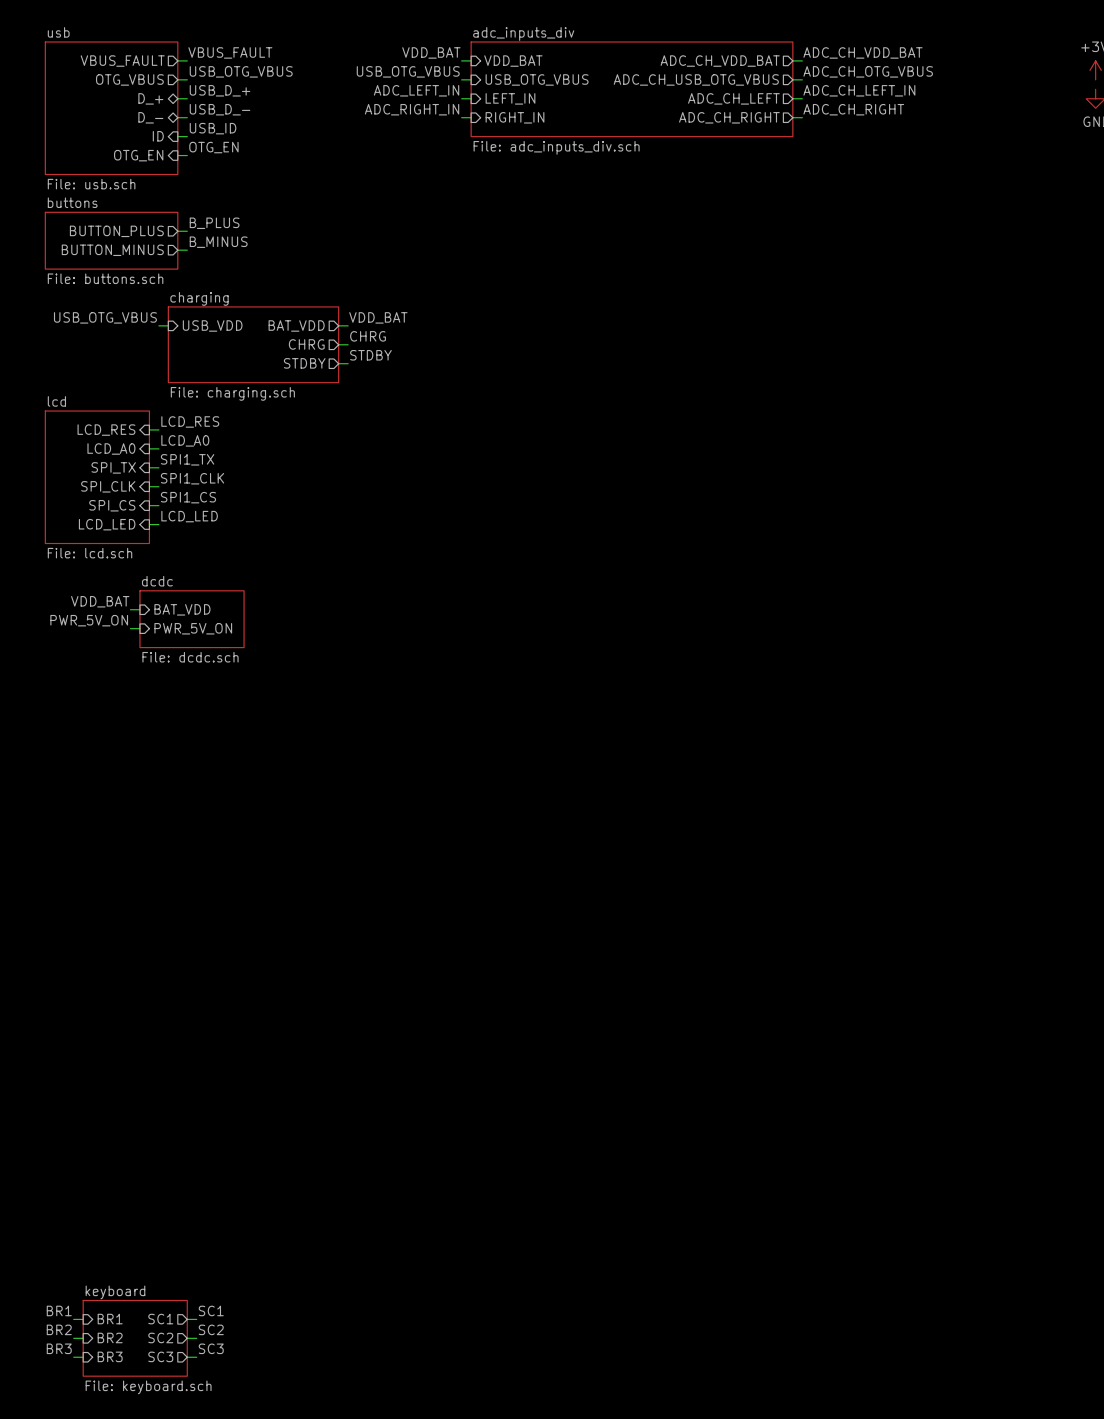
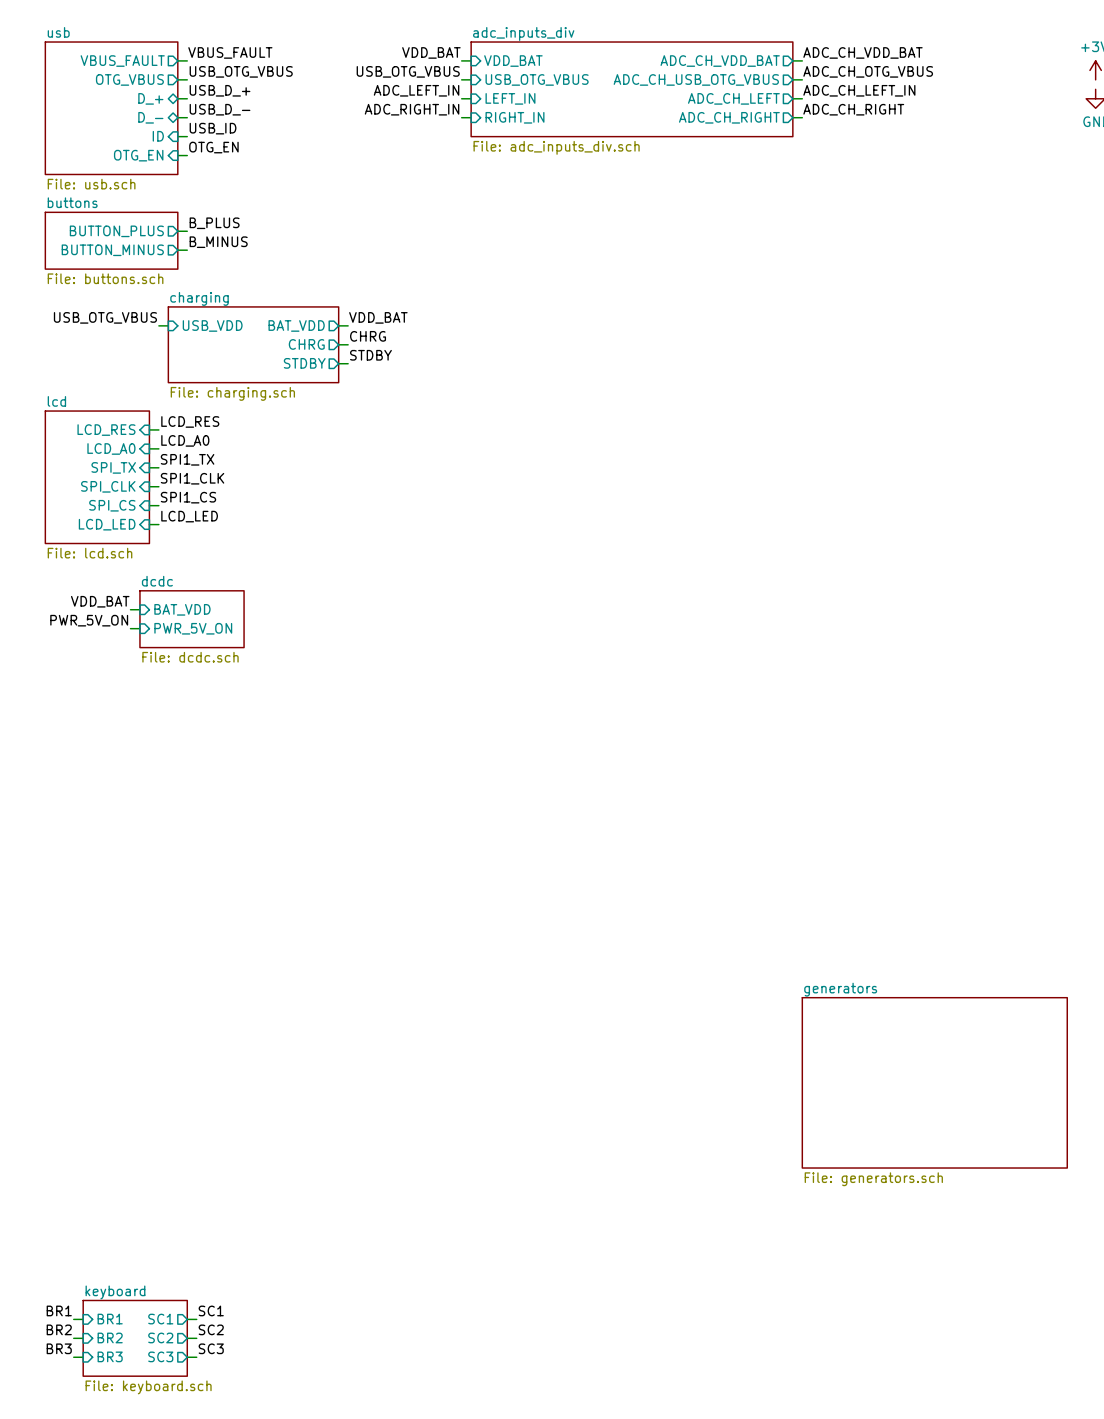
sheet generators: none -> File: generators.sch (934, 1082)

